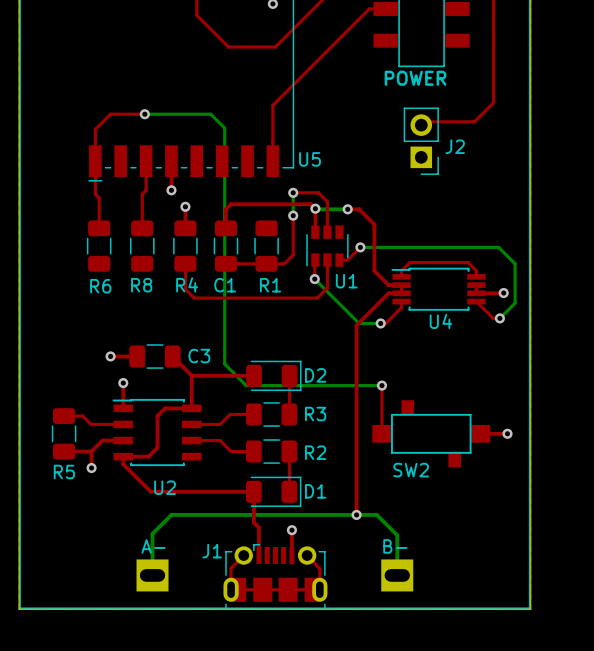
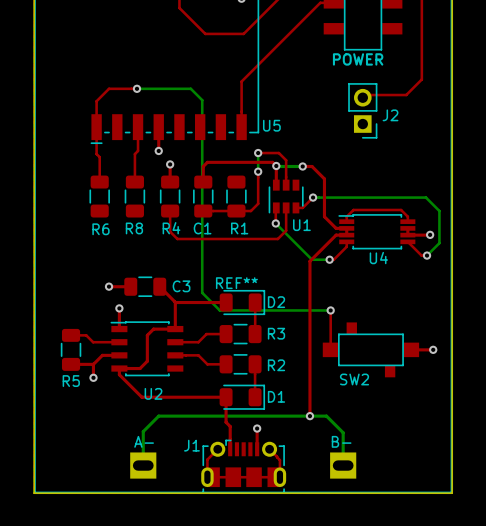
REF**: none -> (236, 283)

